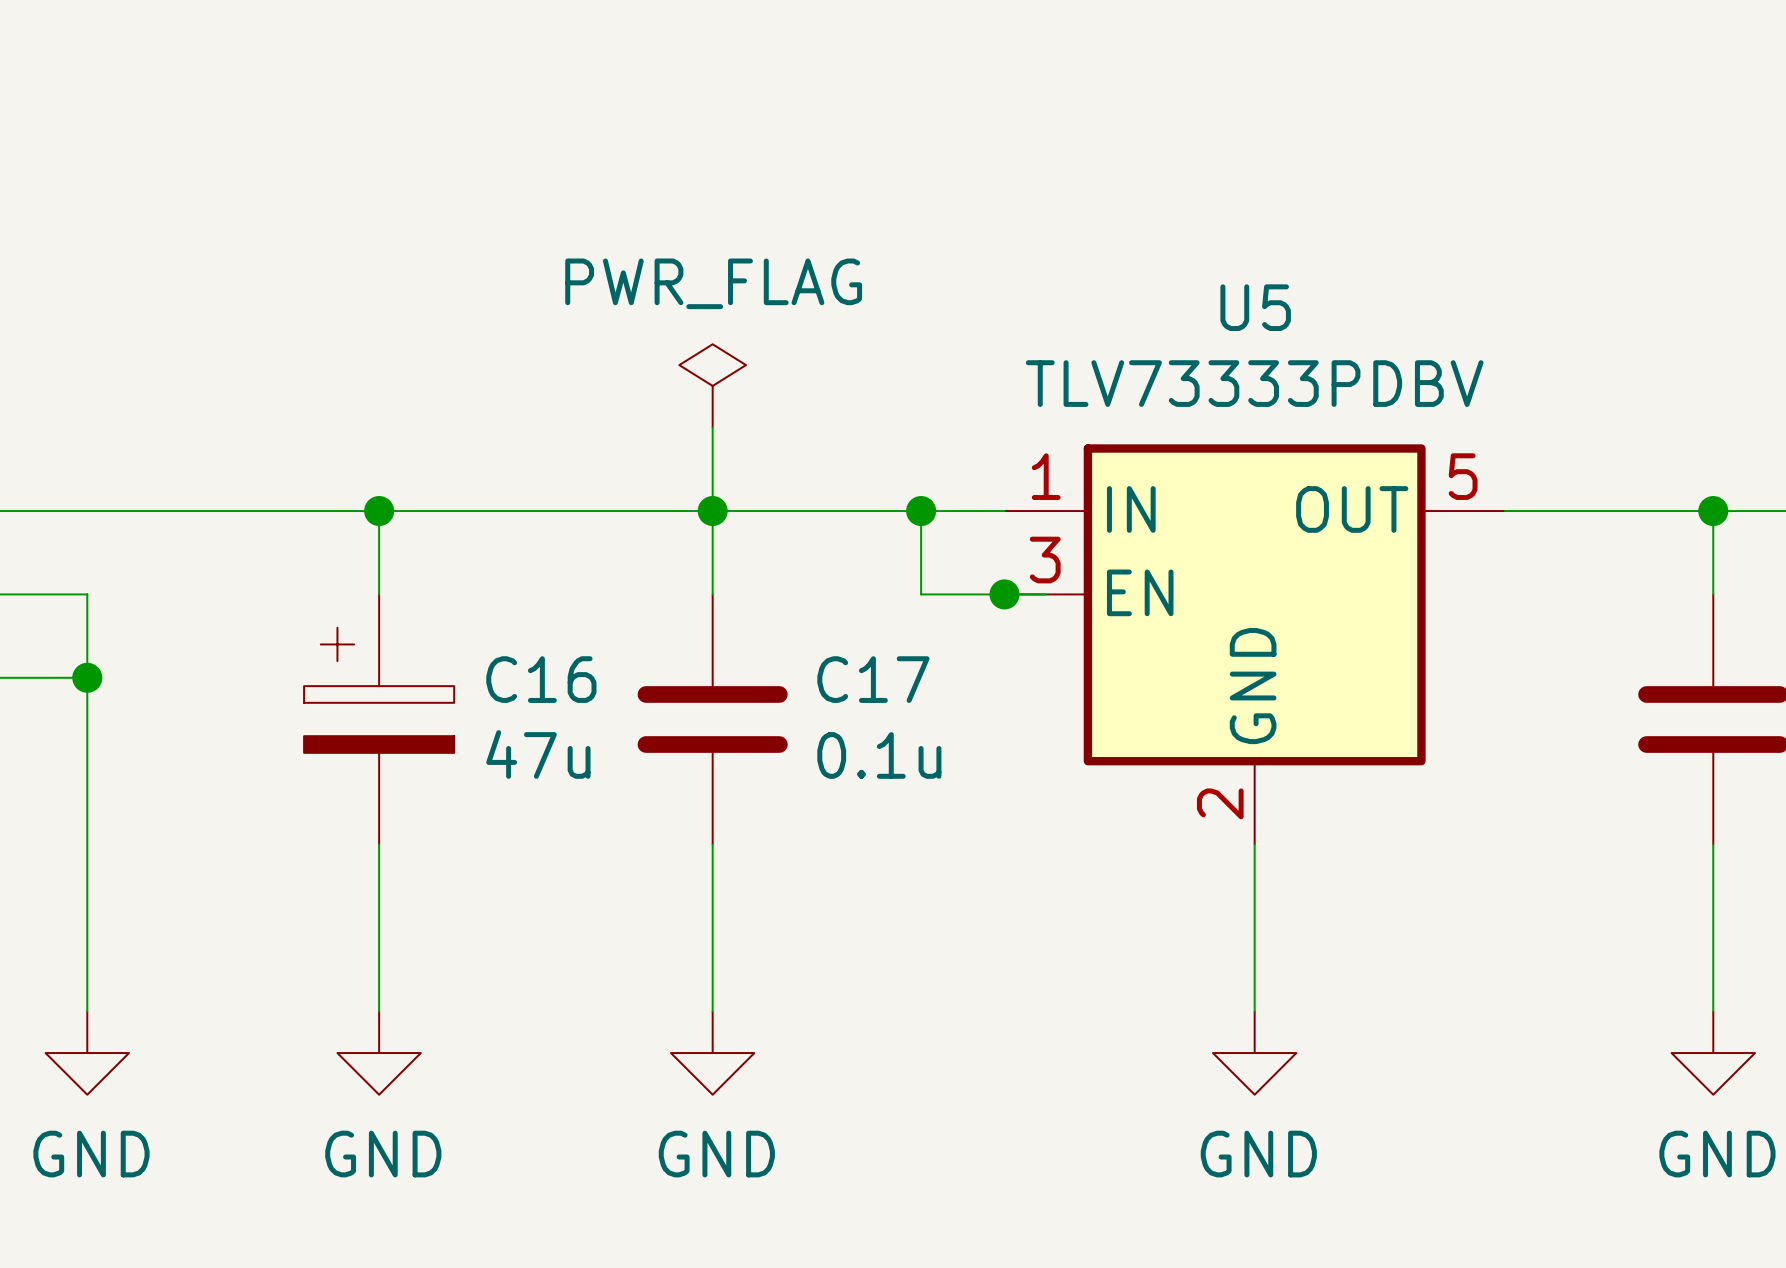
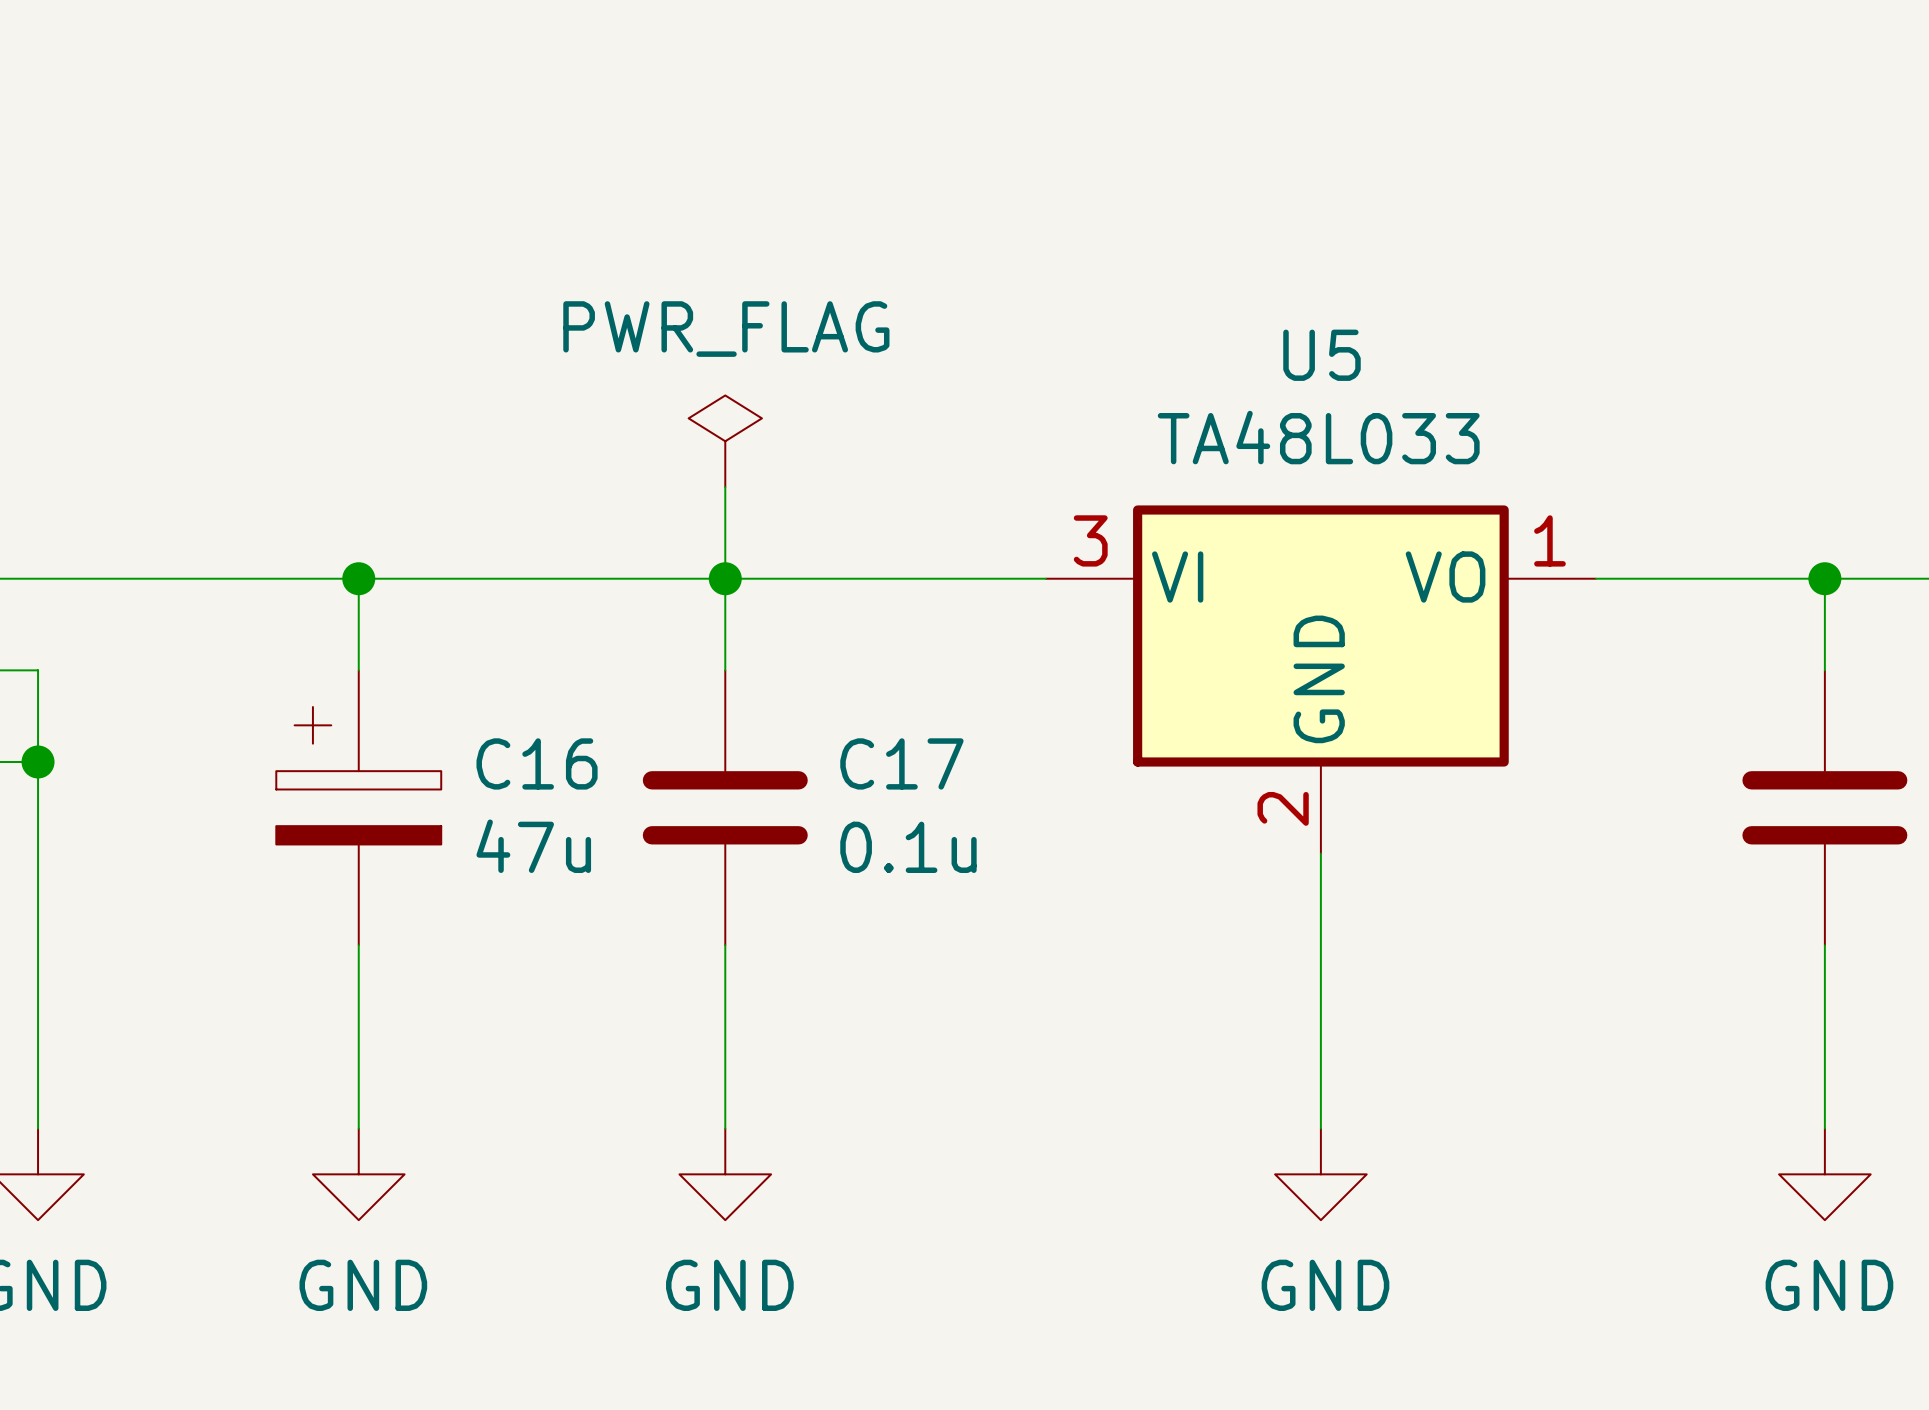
U5 value: TLV73333PDBV (1254, 383) -> TA48L033 (1318, 437)
U5 symbol: [1004, 444, 1505, 845] -> [1046, 505, 1596, 854]
wire: (921, 511) (921, 594) (1046, 594) -> none
junction: (921, 511) -> none
junction: (1004, 594) -> none

